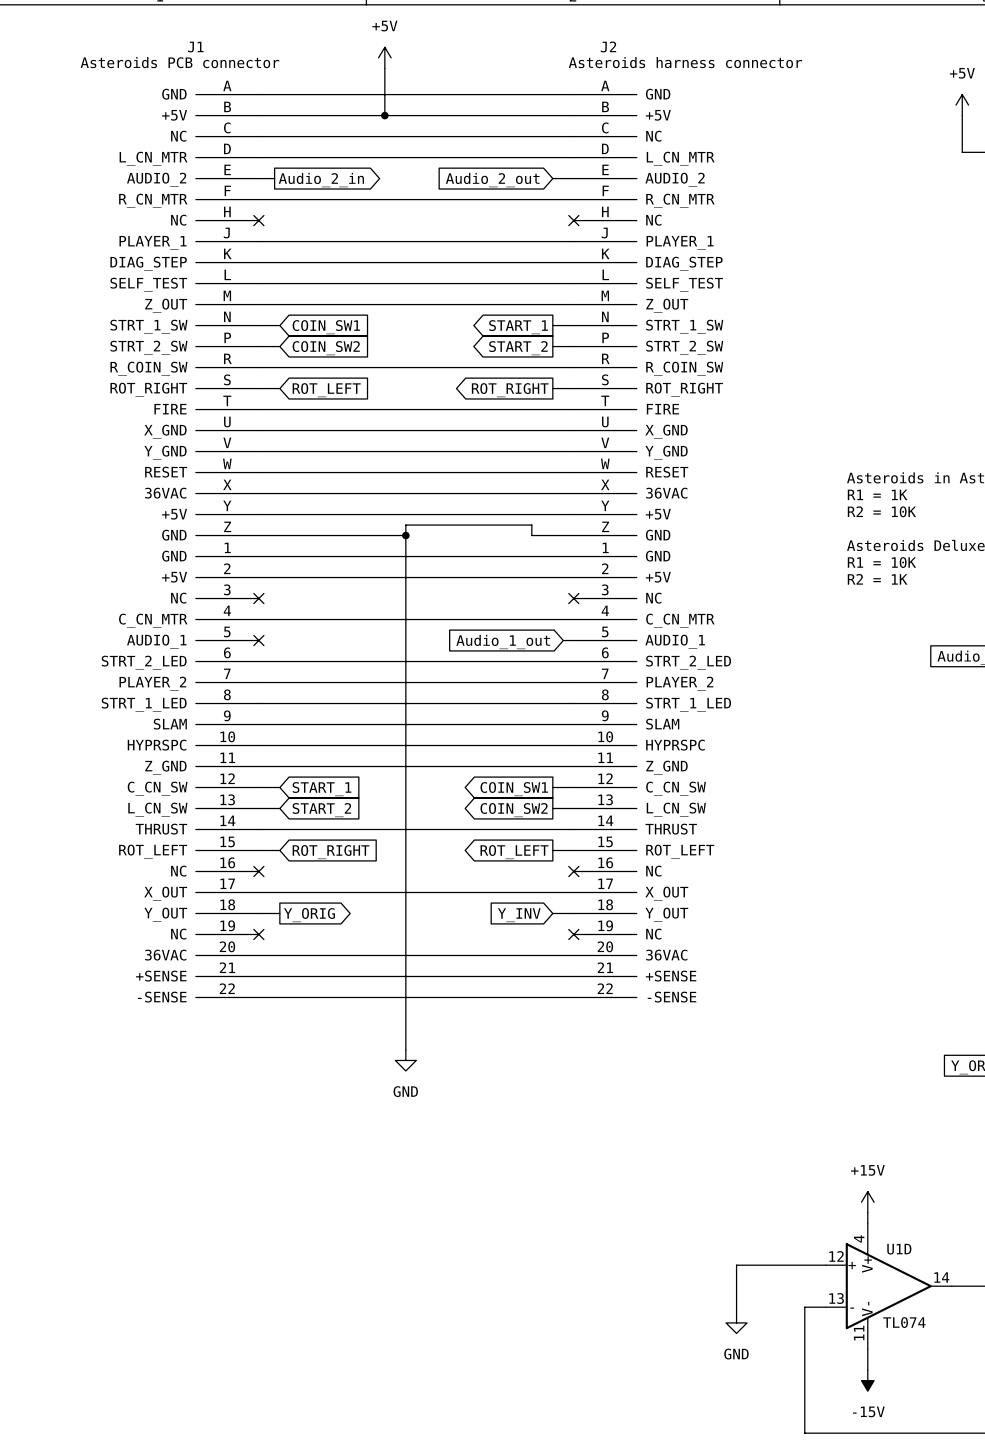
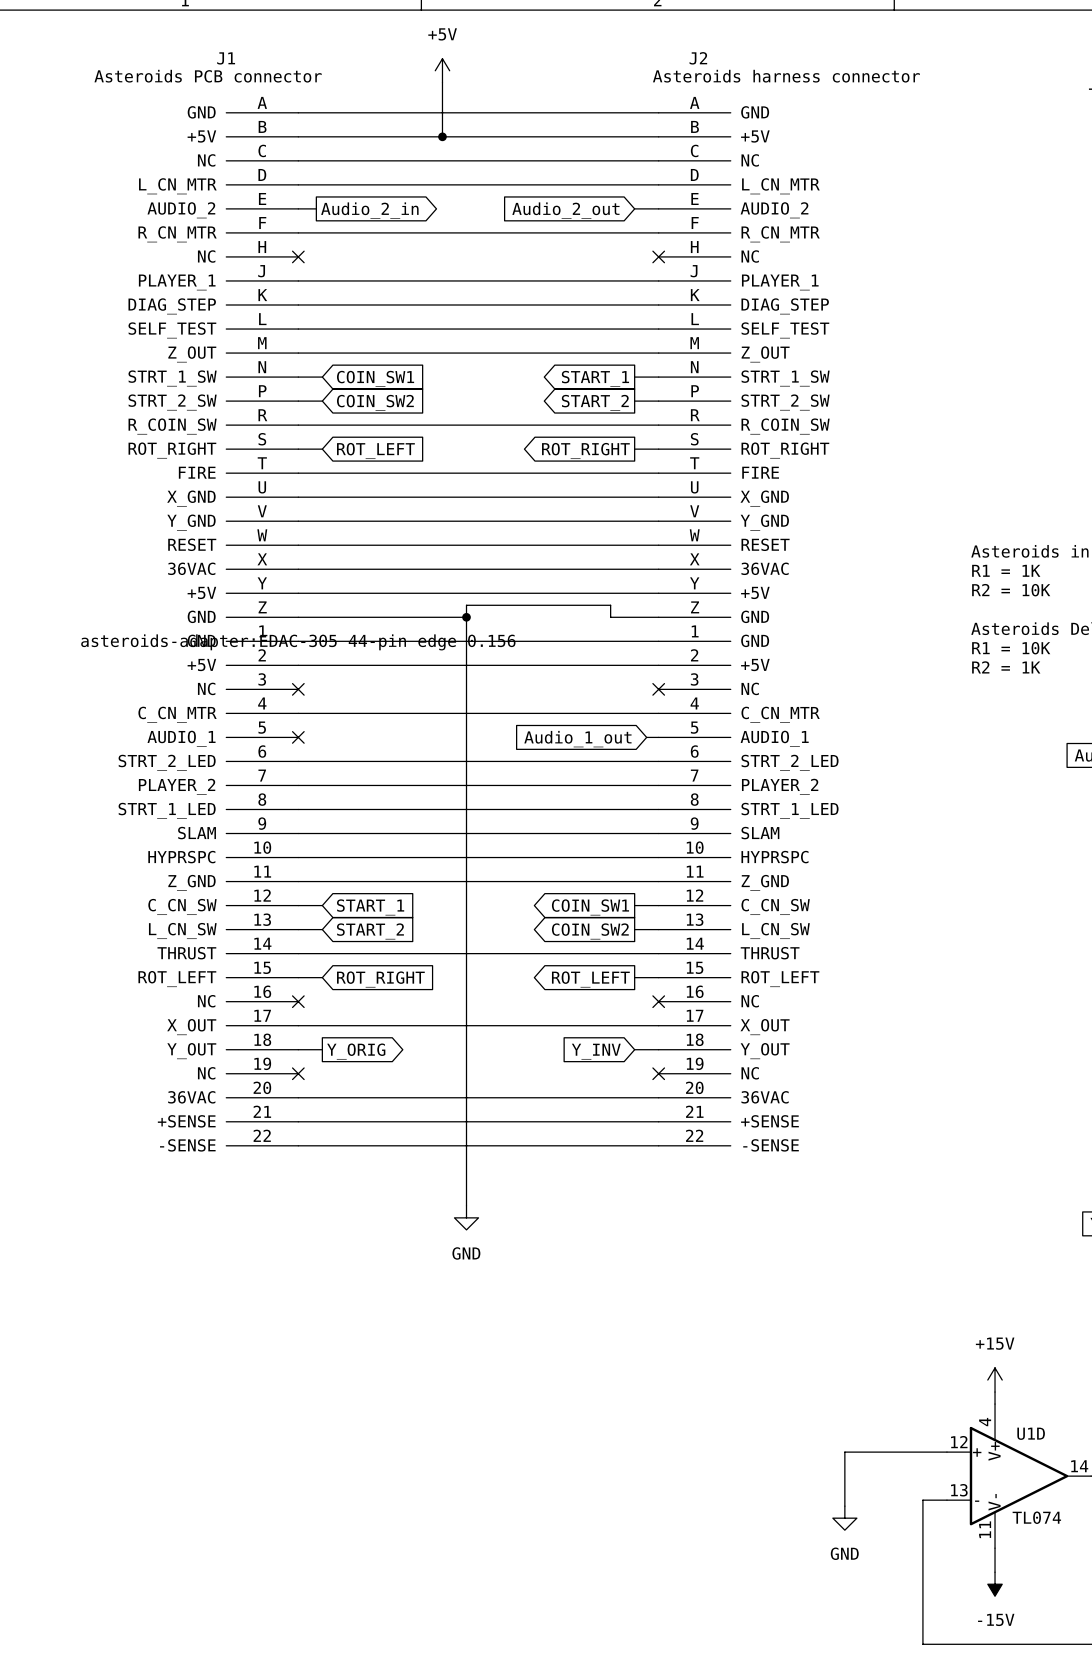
J1 text: none -> asteroids-adapter:EDAC-305 44-pin edge 0.156 (298, 642)

